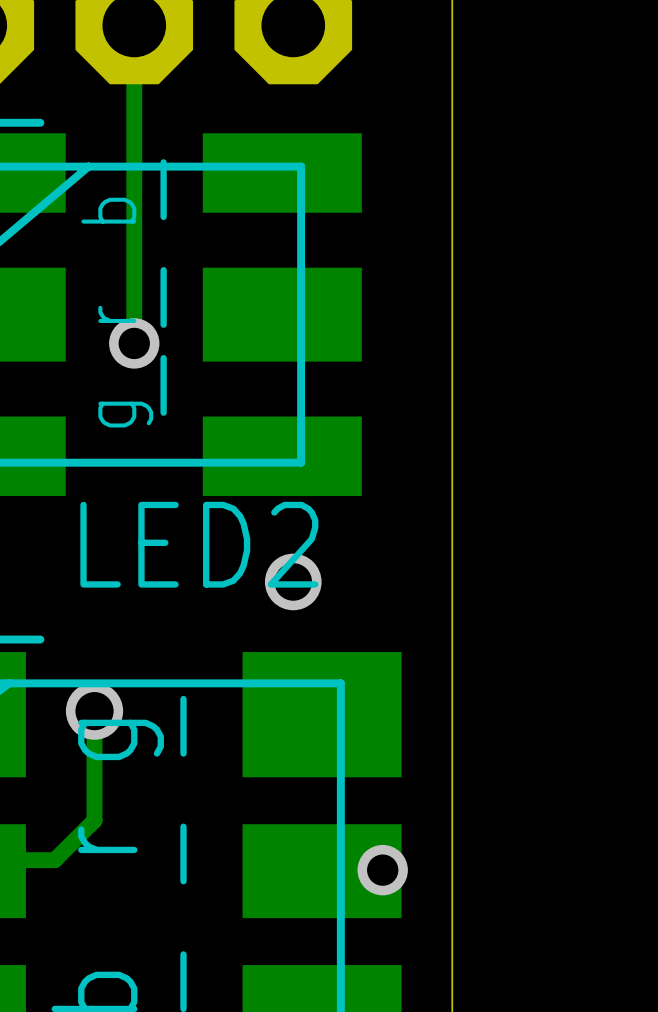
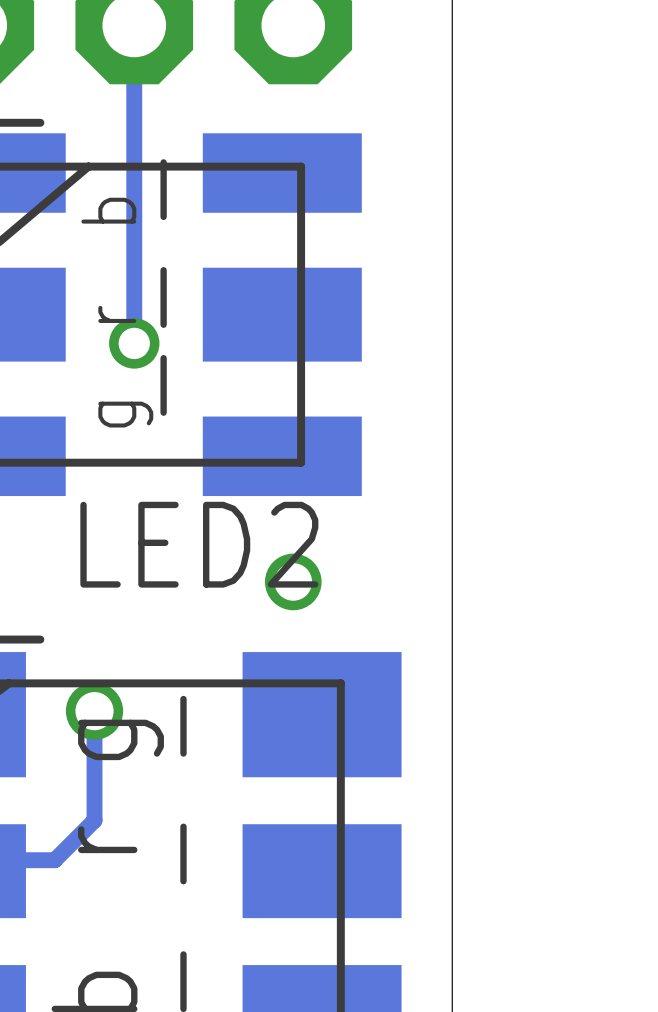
via: (382, 870) -> none

